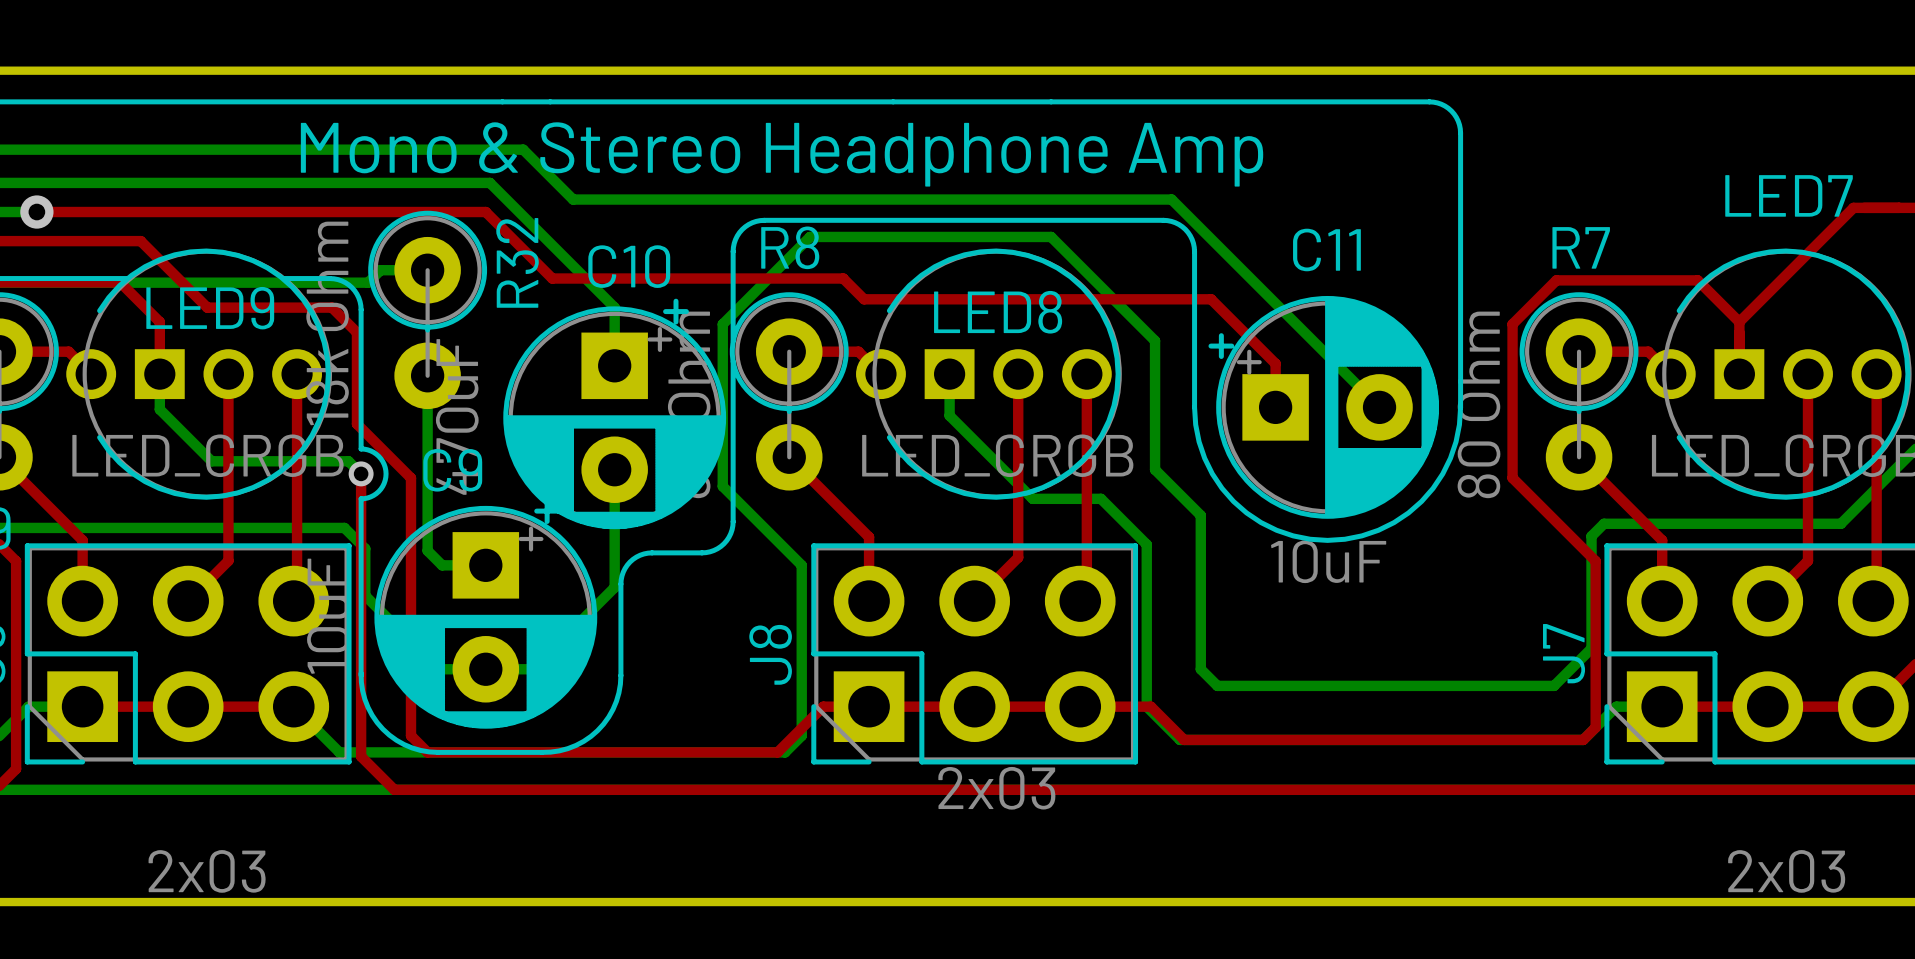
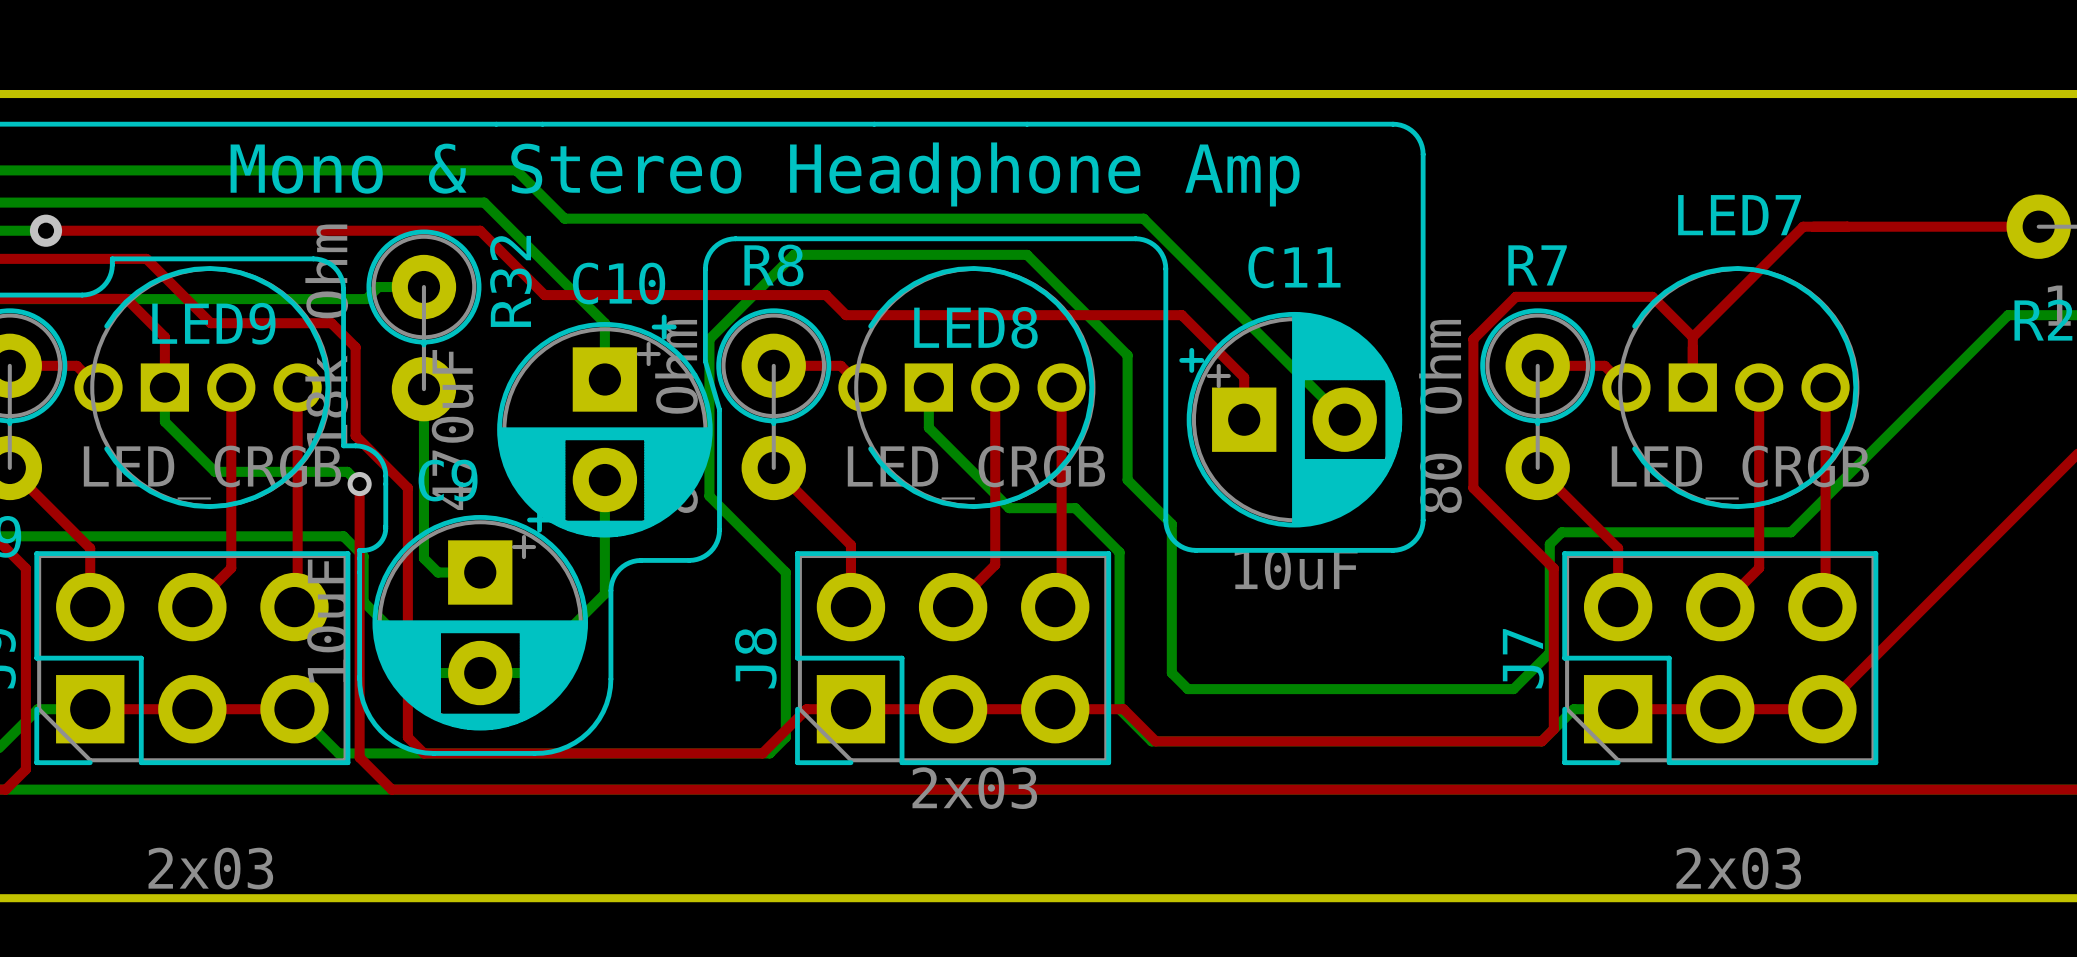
line: (764, 220) (752, 222) (745, 226) (739, 232) (734, 243) (733, 340) -> (749, 238) (731, 239) (720, 242) (709, 253) (705, 264) (705, 361) (719, 409)
line: (74, 278) (126, 278) -> none
line: (284, 278) (338, 279) (351, 287) (360, 301) (361, 448) (370, 450) (378, 456) (384, 464) (386, 473) (384, 483) (378, 491) (370, 496) (361, 498) (361, 542) -> (82, 295) (93, 292) (106, 283) (111, 272) (112, 258) (313, 258) (324, 261) (334, 267) (341, 277) (343, 289) (343, 445) (359, 446) (370, 449) (381, 460) (385, 472) (385, 533) (381, 541) (374, 547) (359, 550)
line: (733, 361) (733, 396) -> none
line: (1194, 407) (1199, 441) (1204, 458) (1212, 473) (1233, 501) (1261, 522) (1276, 530) (1310, 539) (1327, 540) (1344, 539) (1378, 530) (1408, 512) (1421, 501) (1442, 473) (1450, 458) (1456, 441) (1460, 407) -> (1165, 419) (1166, 528) (1172, 538) (1177, 544) (1184, 548) (1195, 550) (1392, 550) (1408, 546) (1419, 535) (1422, 524) (1423, 419)

